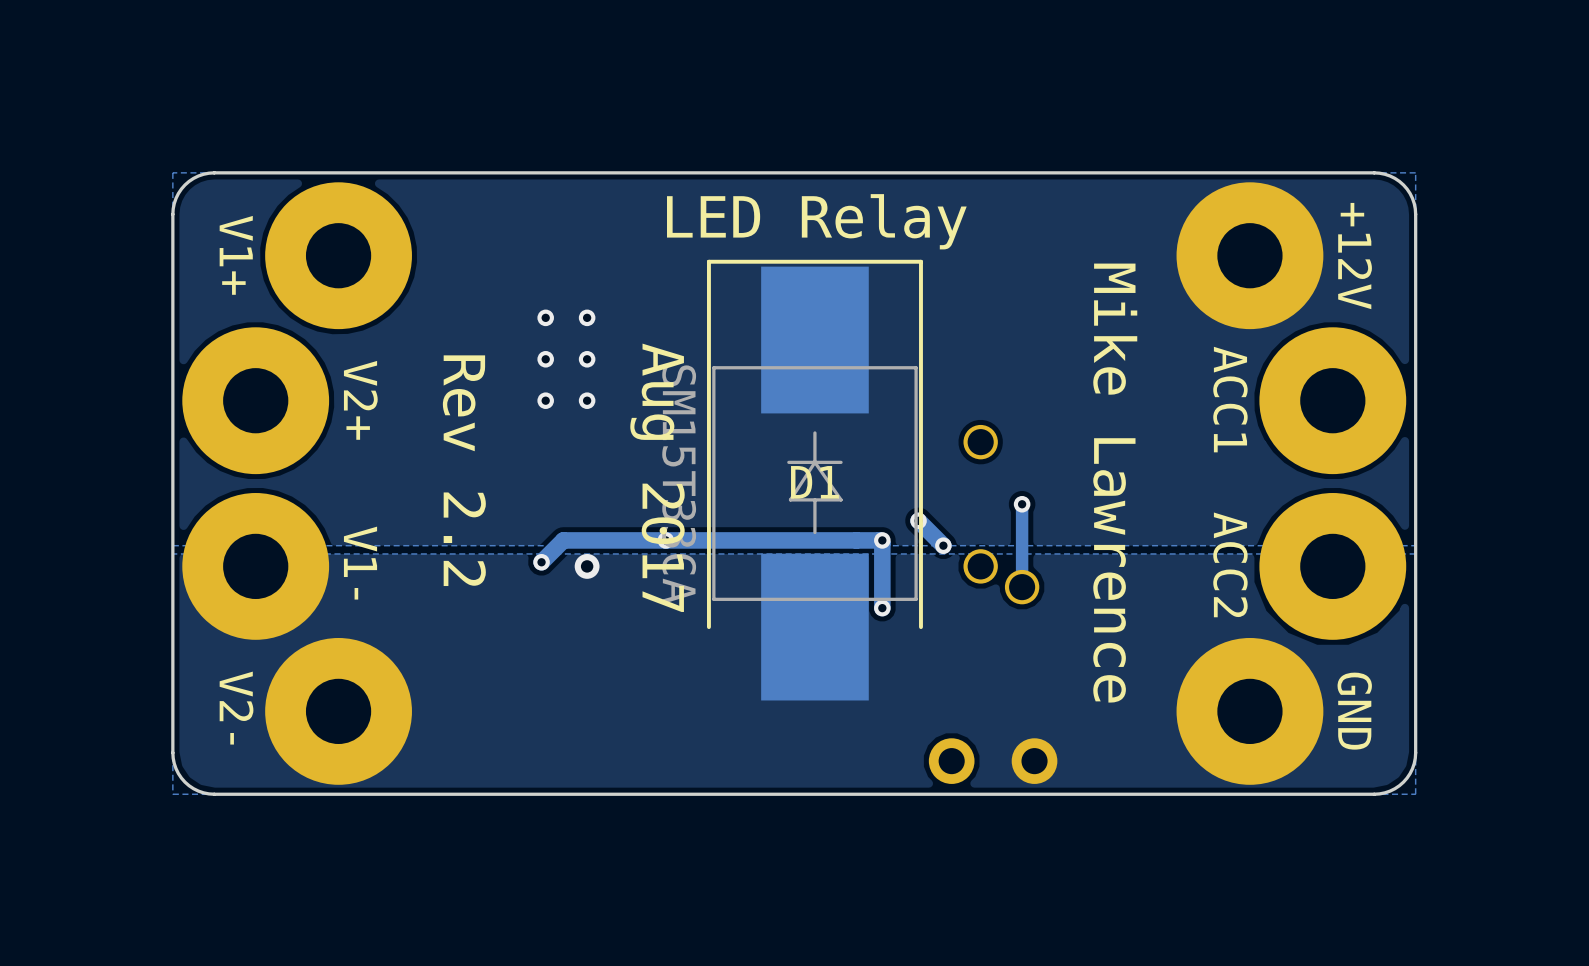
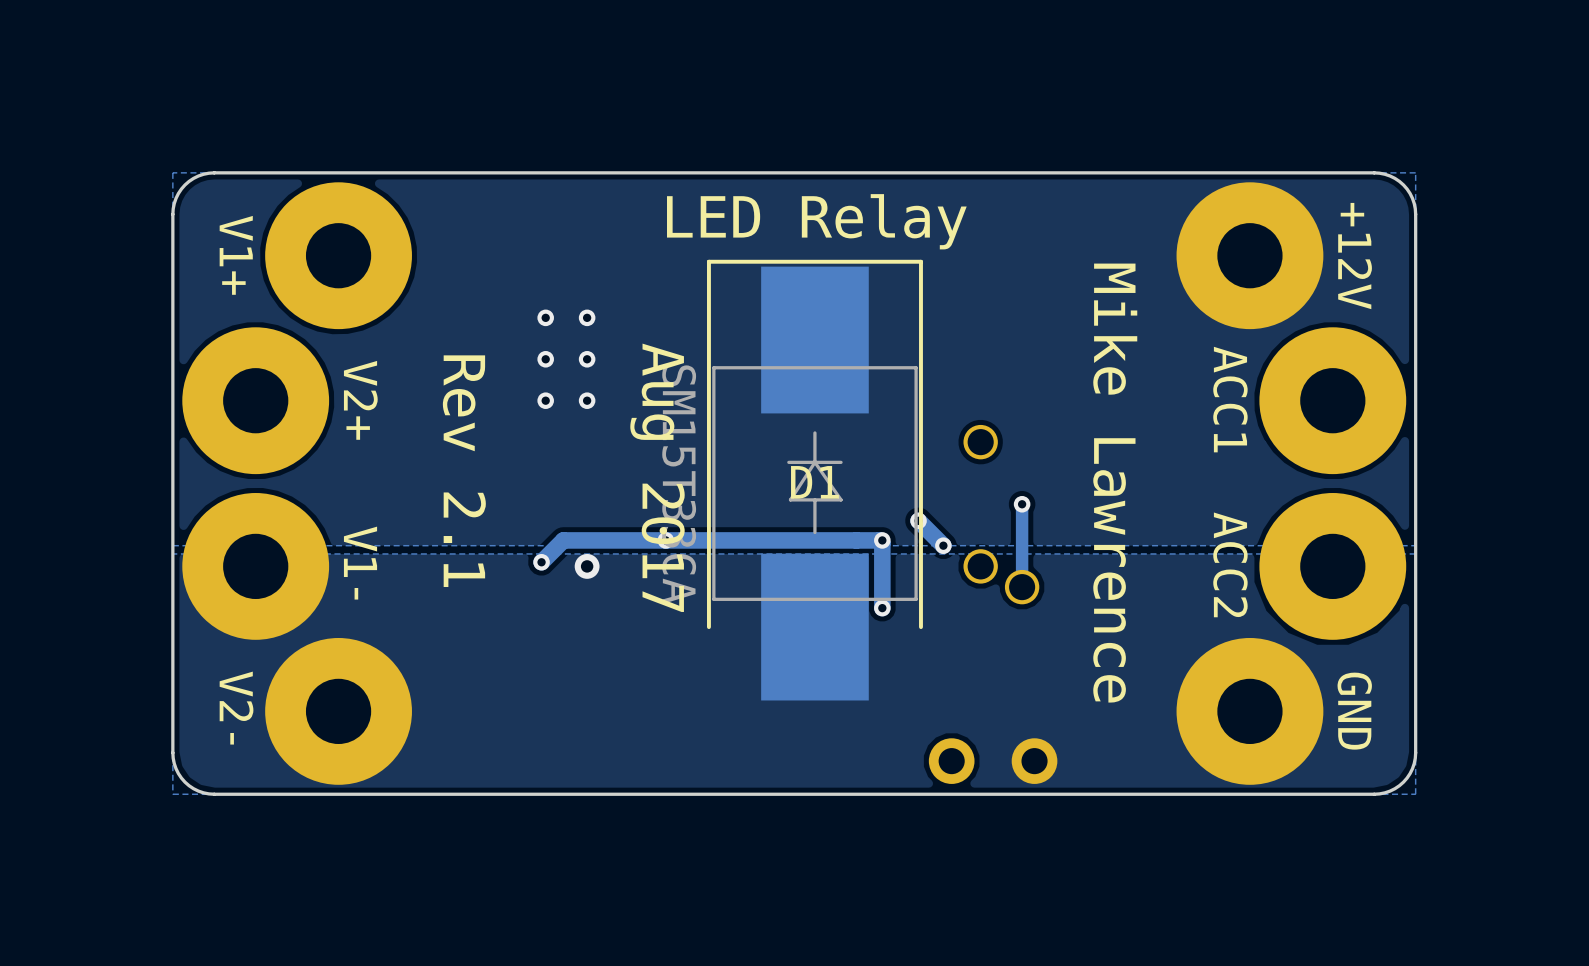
text: Rev 2.2 (464, 470) -> Rev 2.1 (464, 471)

